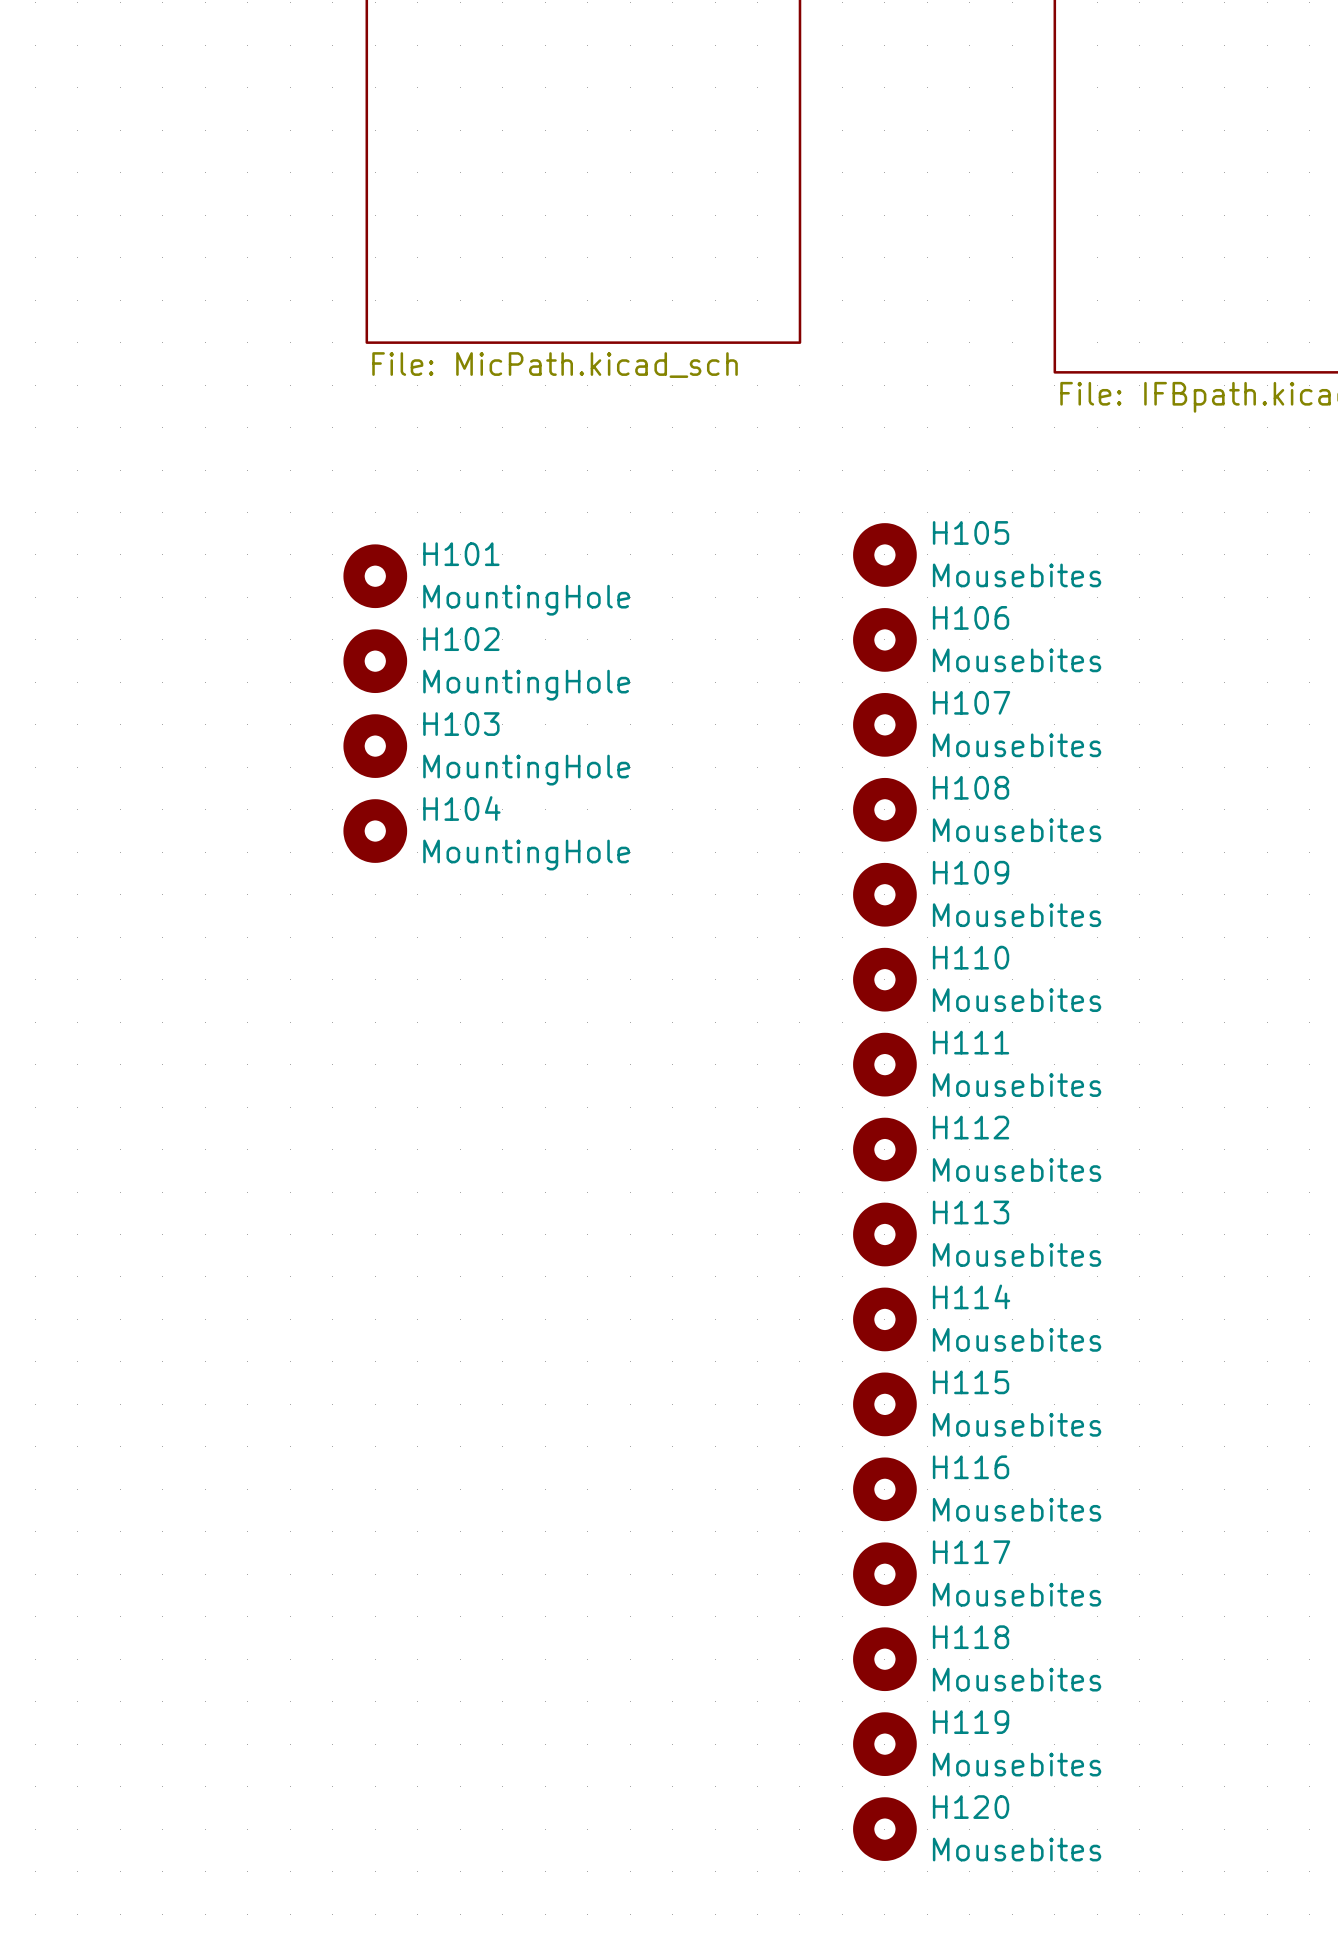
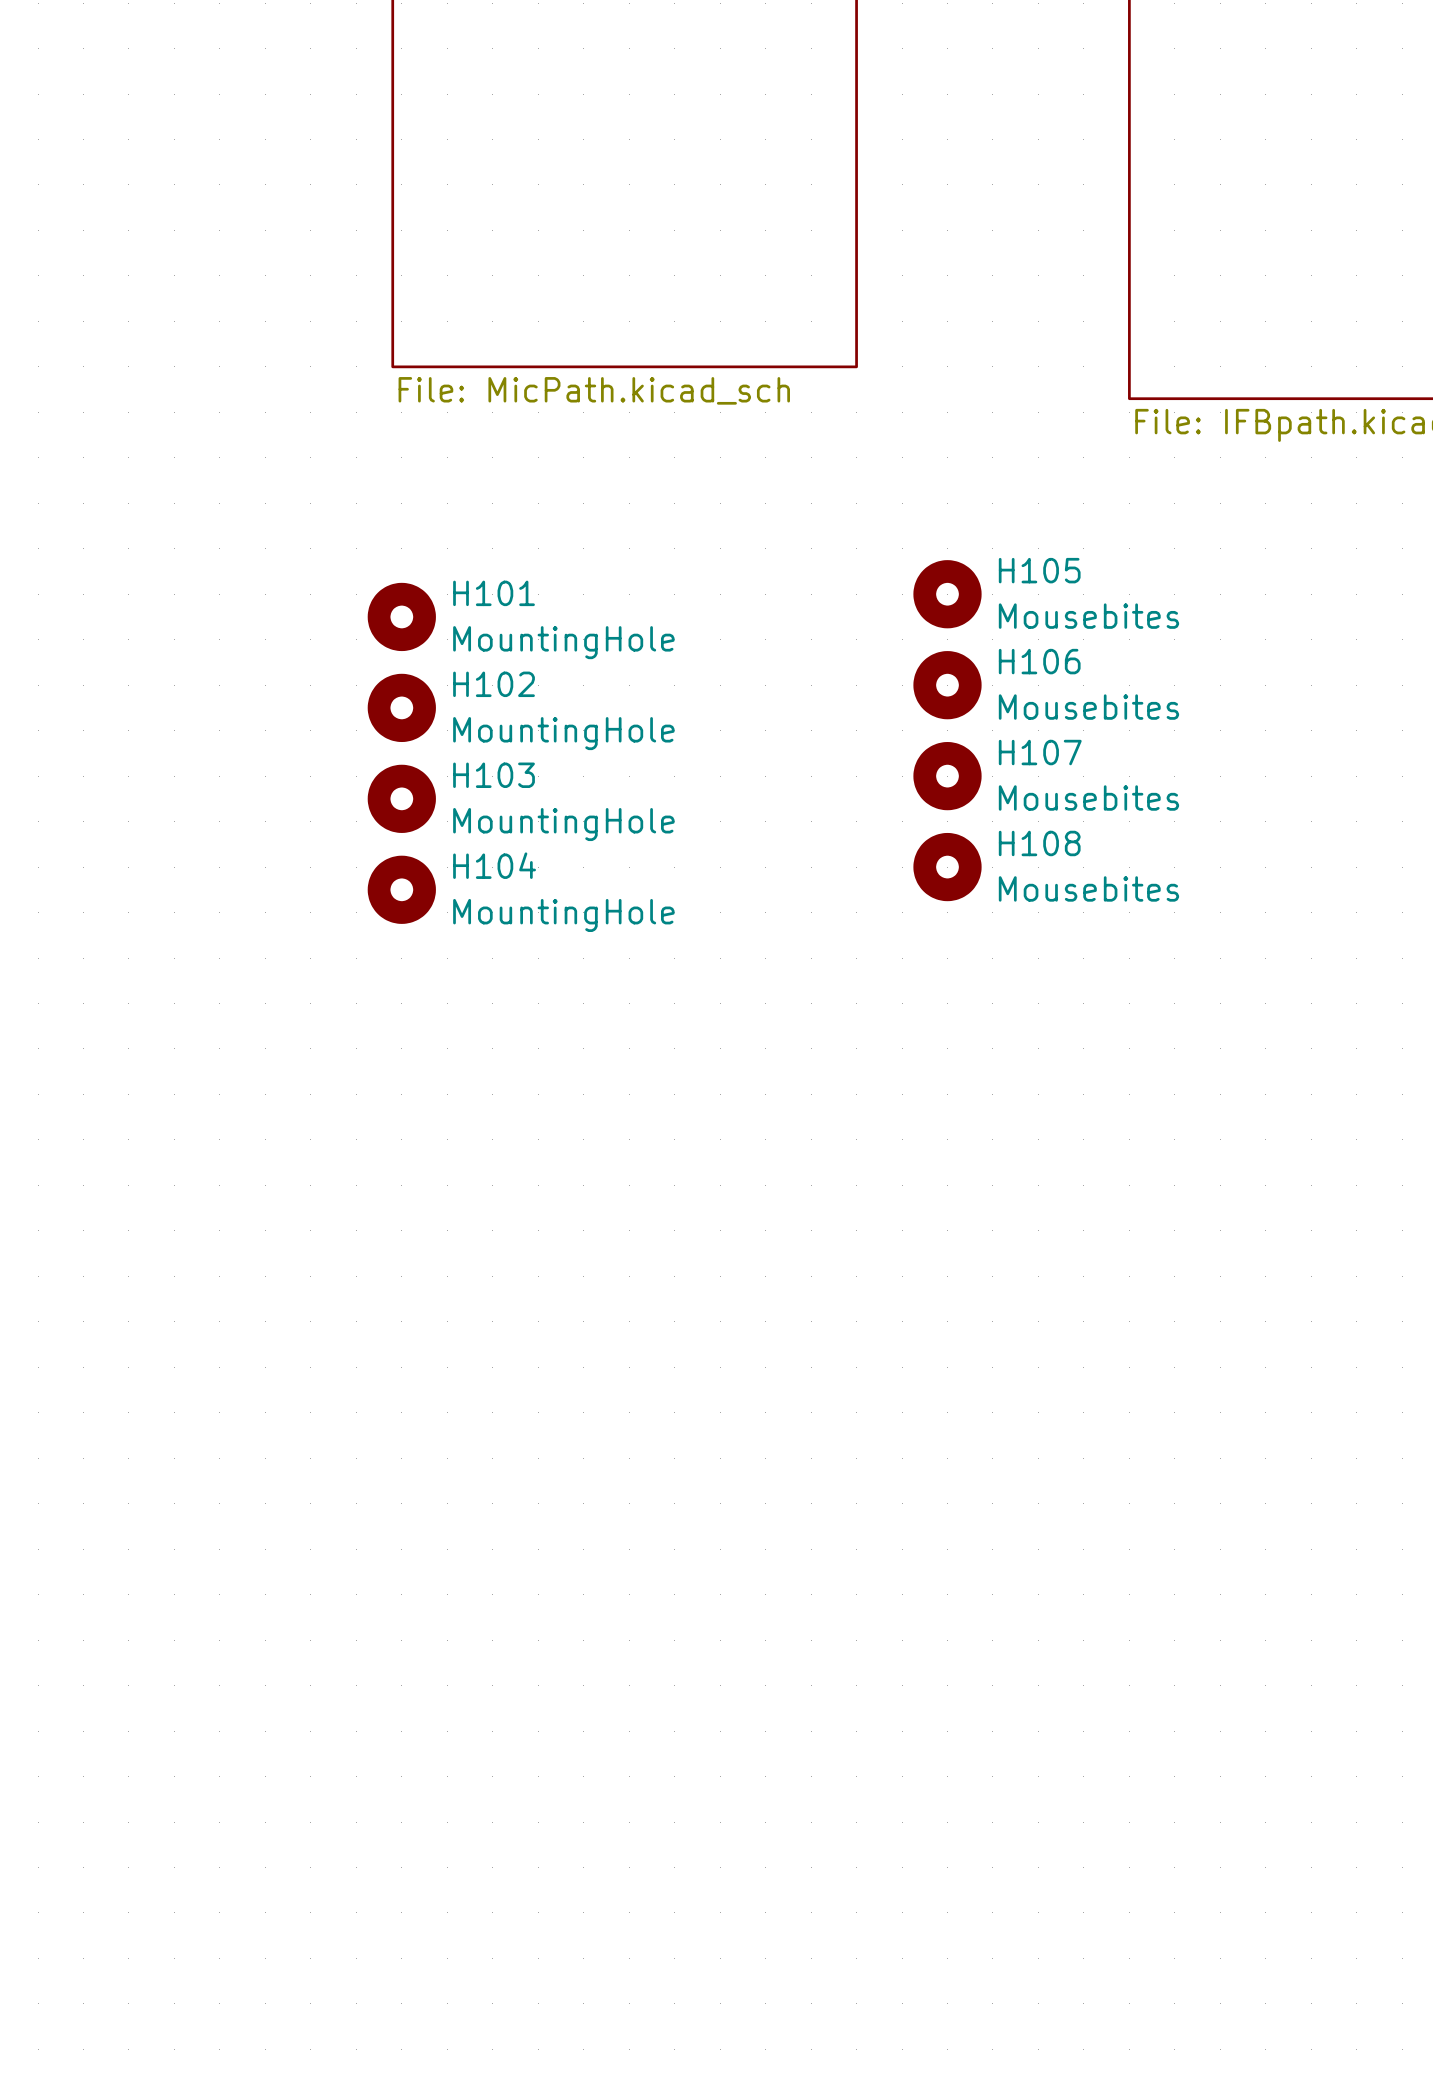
H109: Mousebites (884, 894) -> none
H110: Mousebites (884, 979) -> none
H111: Mousebites (884, 1064) -> none
H112: Mousebites (884, 1149) -> none
H113: Mousebites (884, 1234) -> none
H114: Mousebites (884, 1319) -> none
H115: Mousebites (884, 1404) -> none
H116: Mousebites (884, 1489) -> none
H117: Mousebites (884, 1574) -> none
H118: Mousebites (884, 1659) -> none
H119: Mousebites (884, 1744) -> none
H120: Mousebites (884, 1829) -> none

